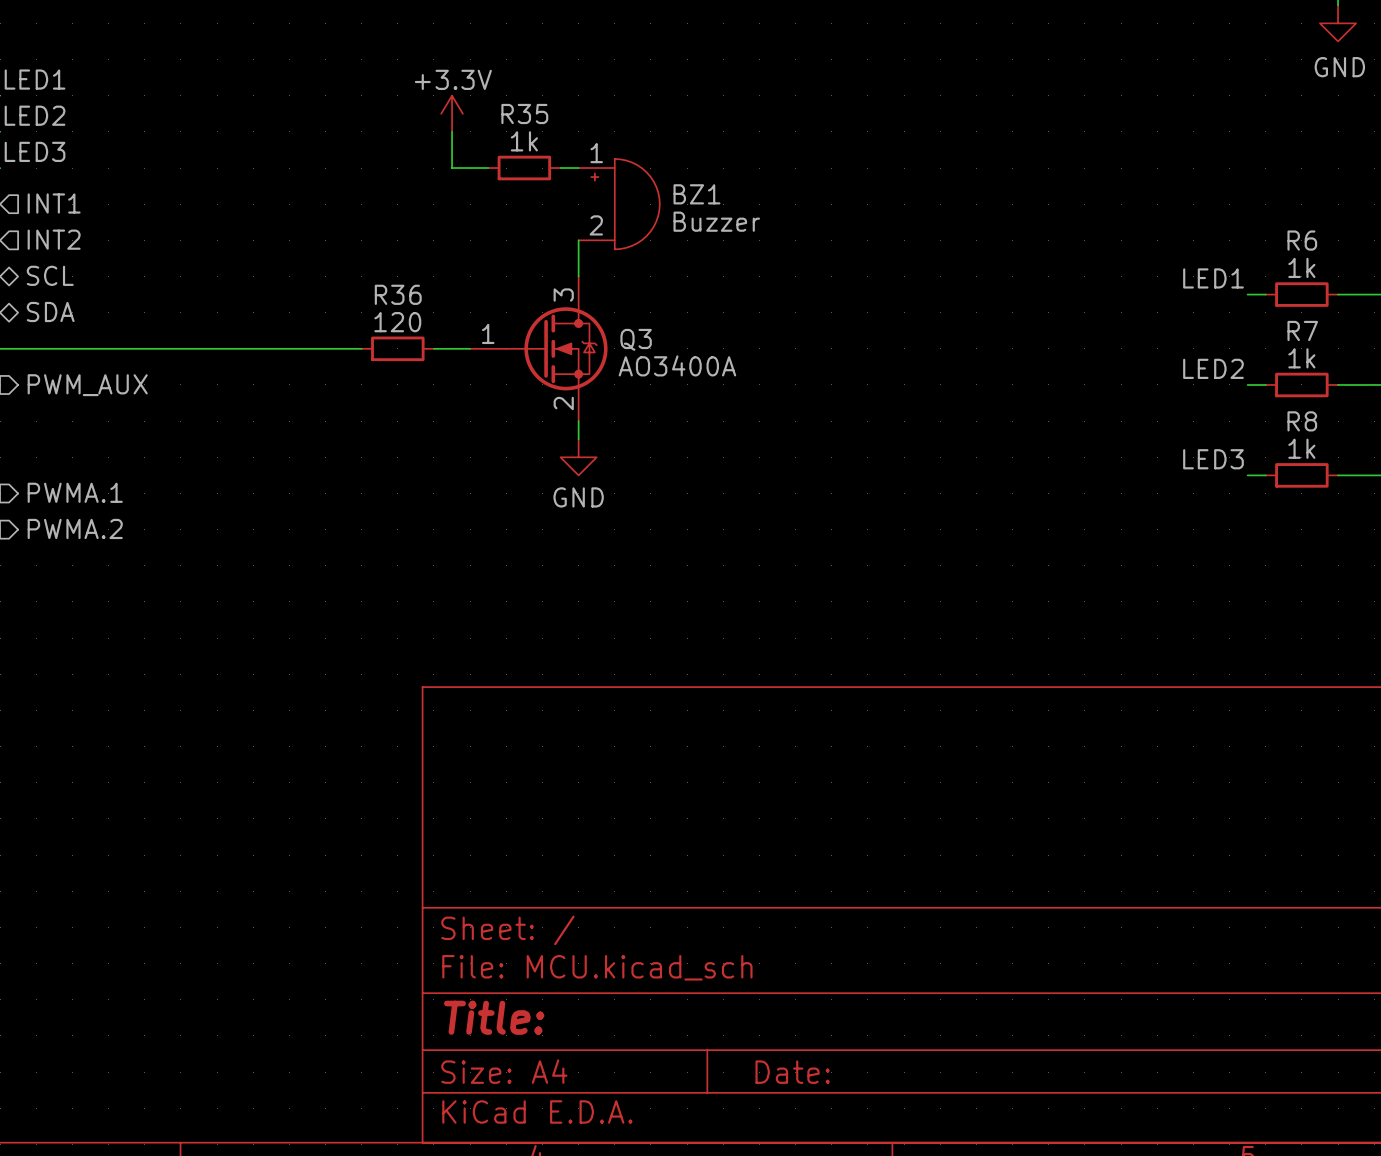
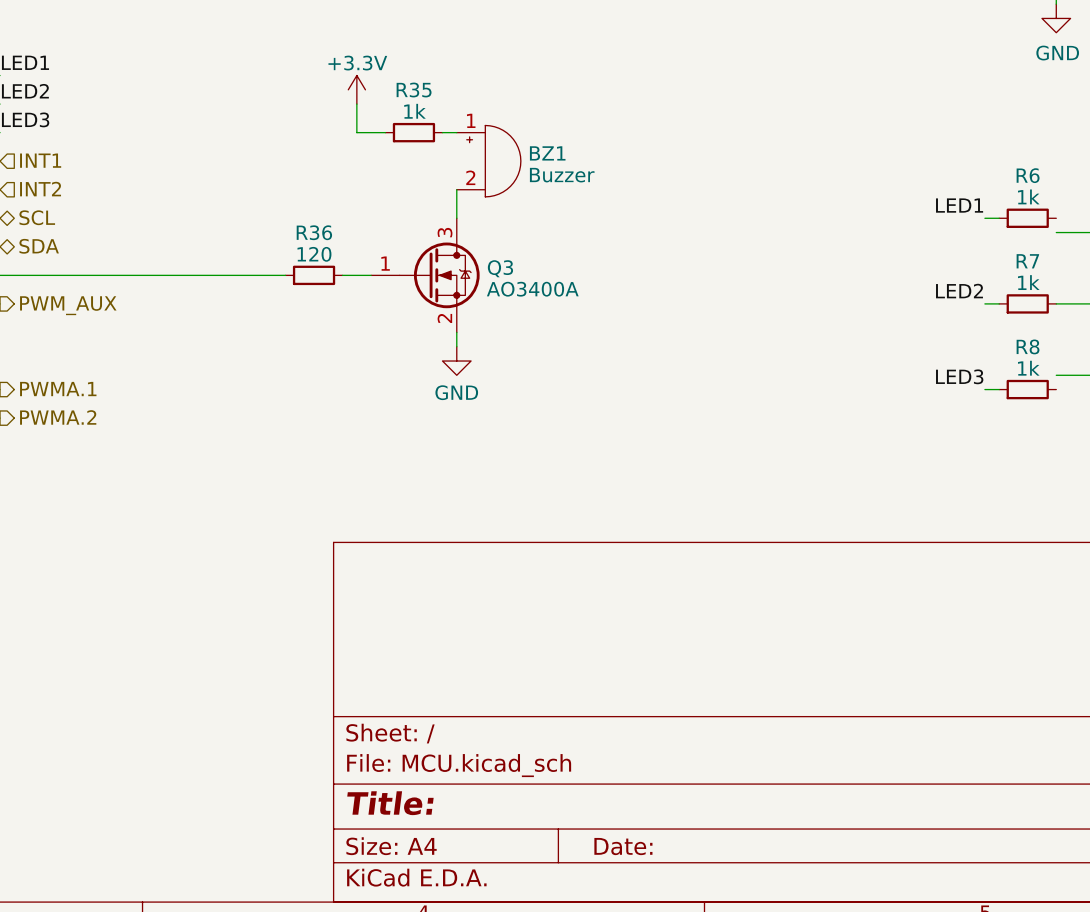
label position: LED1 (1213, 278) -> LED1 (959, 205)
wire: (1247, 294) (1265, 294) -> (984, 218) (999, 218)
R6 position: (1301, 294) -> (1027, 218)
label position: LED3 (1213, 459) -> LED3 (959, 376)
wire: (1247, 475) (1265, 475) -> (984, 389) (999, 389)
R8 position: (1301, 475) -> (1027, 389)

